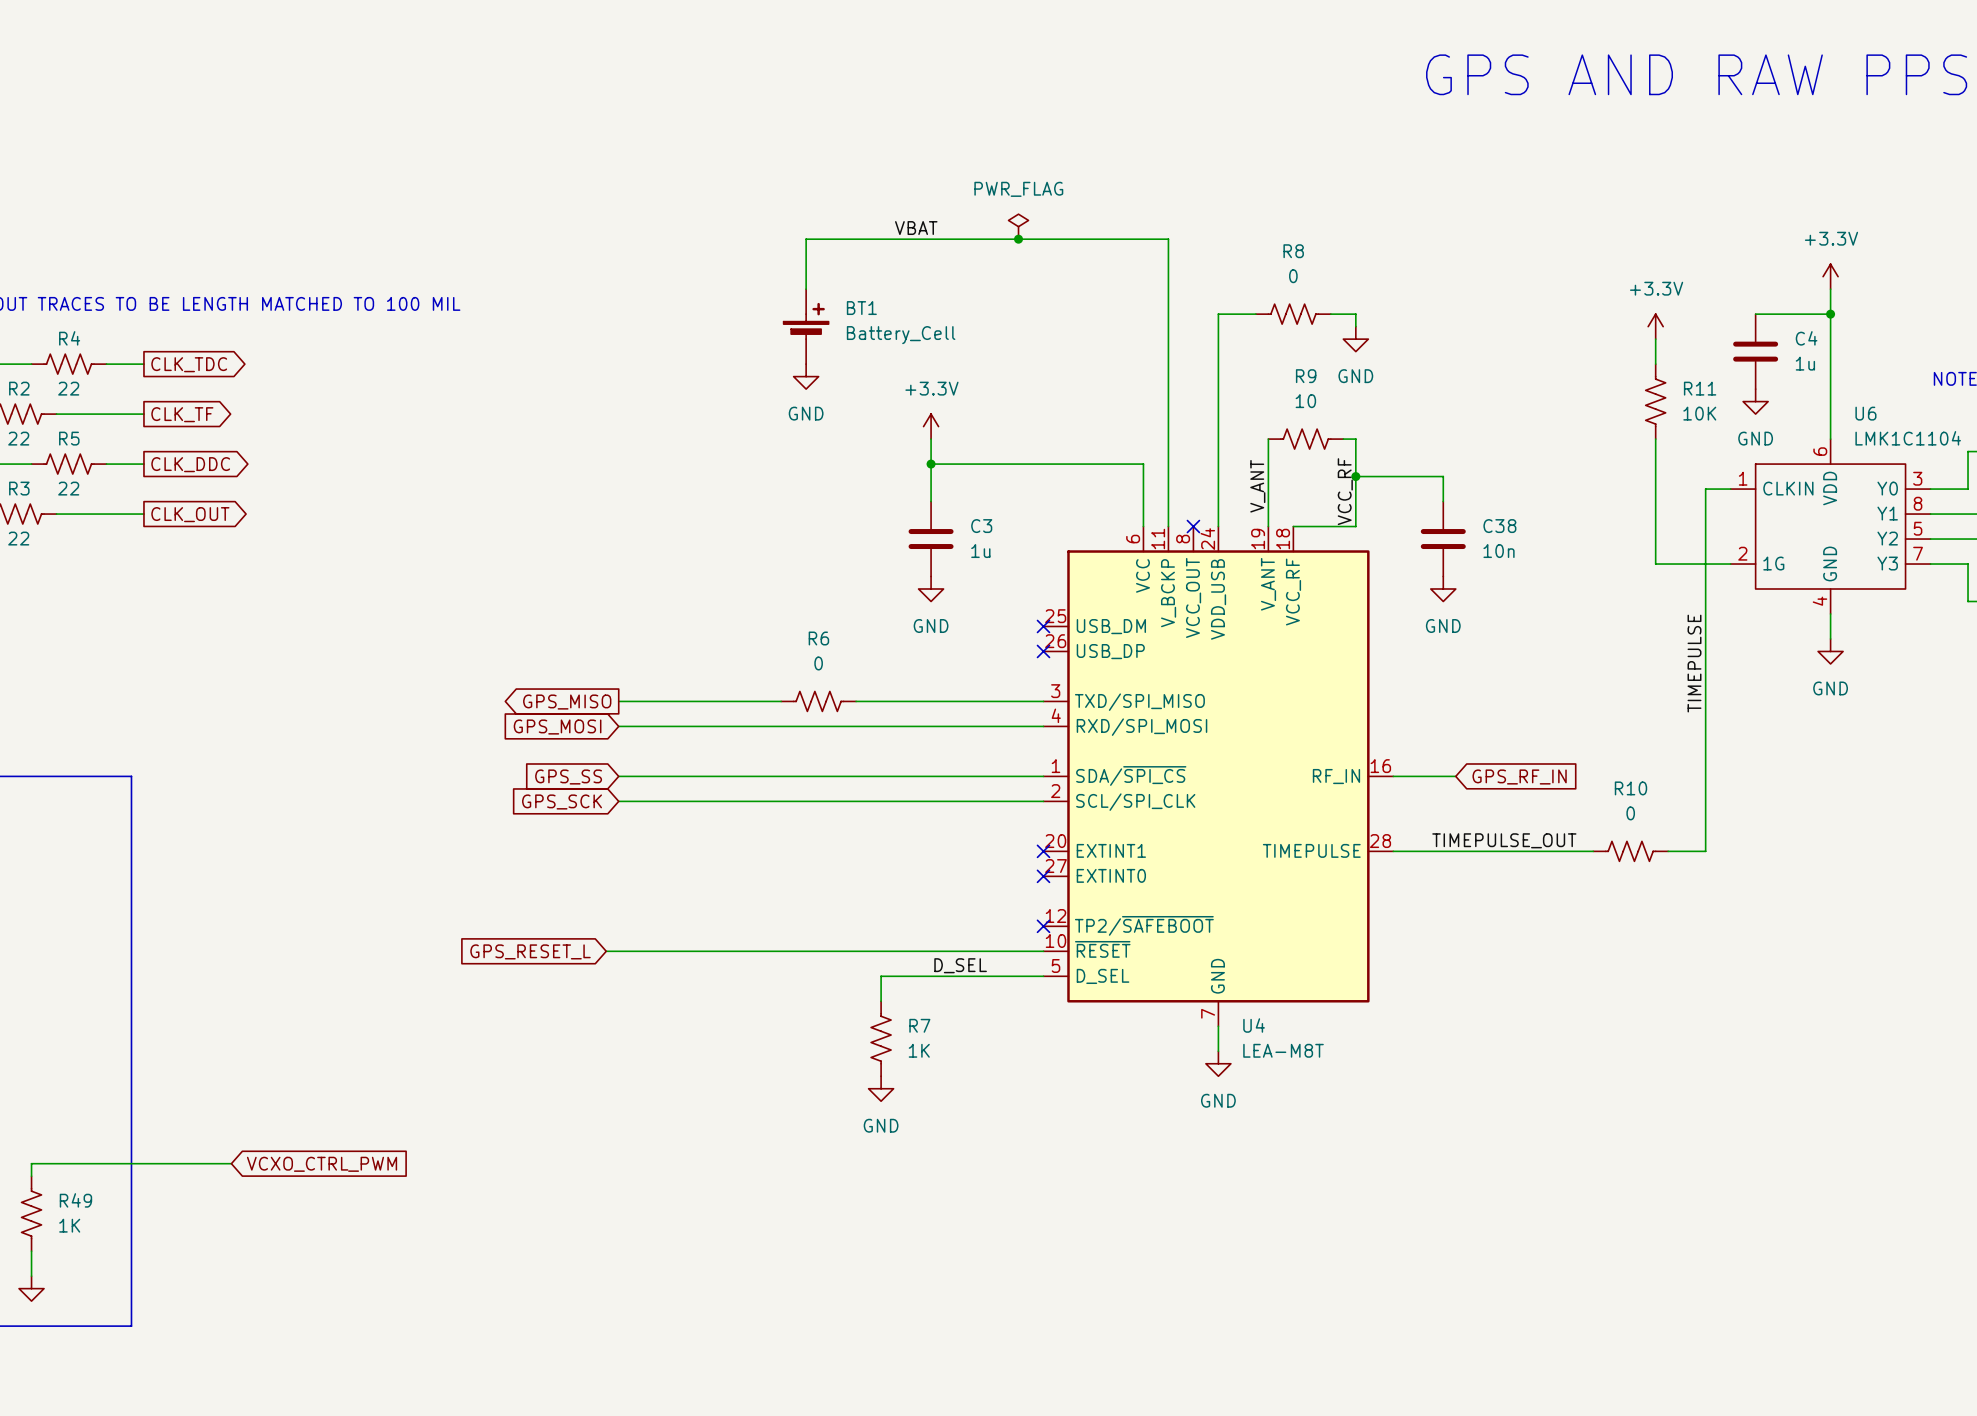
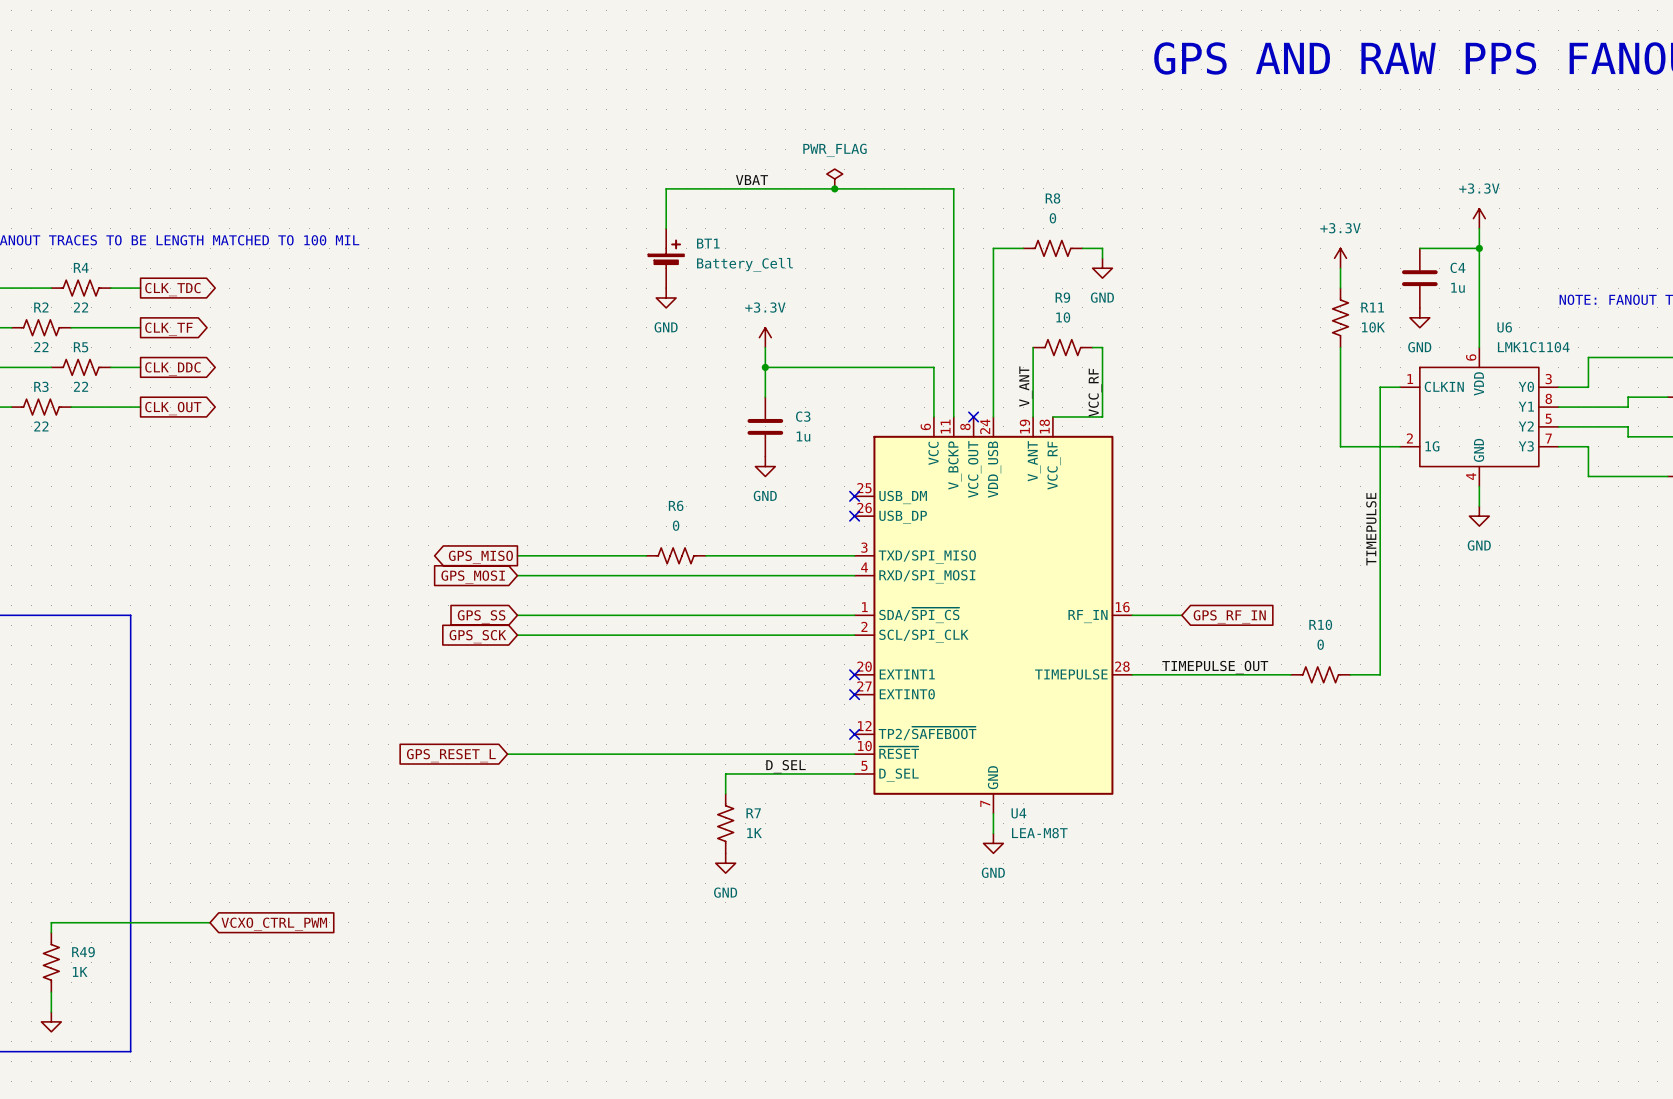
wire: (1355, 476) (1443, 476) (1443, 501) -> none
junction: (1355, 476) -> none
C38: 10n (1443, 539) -> none
power symbol: GND (1443, 589) -> none

